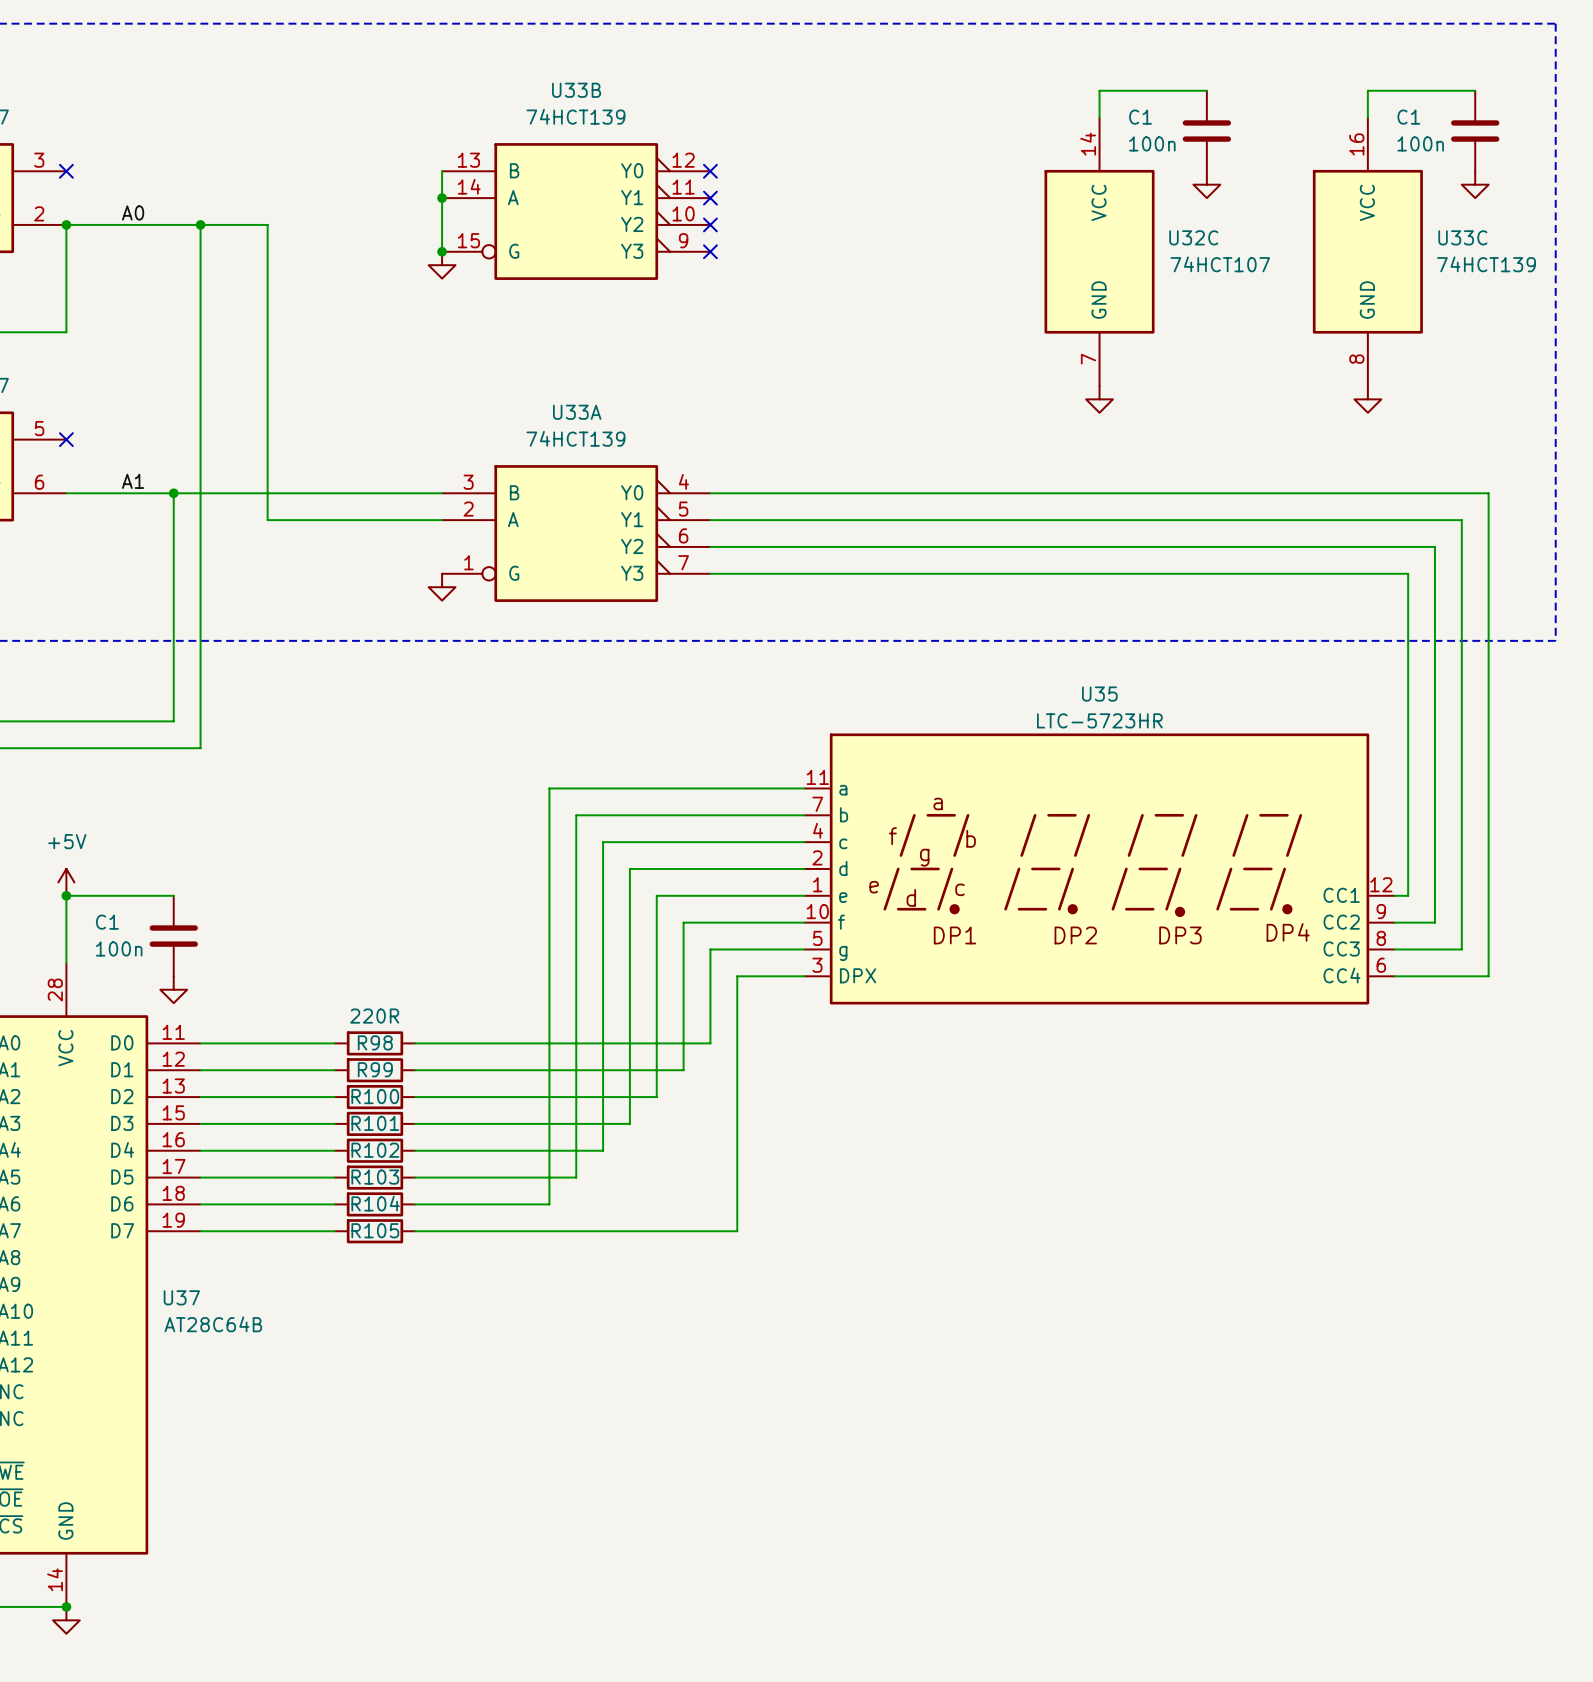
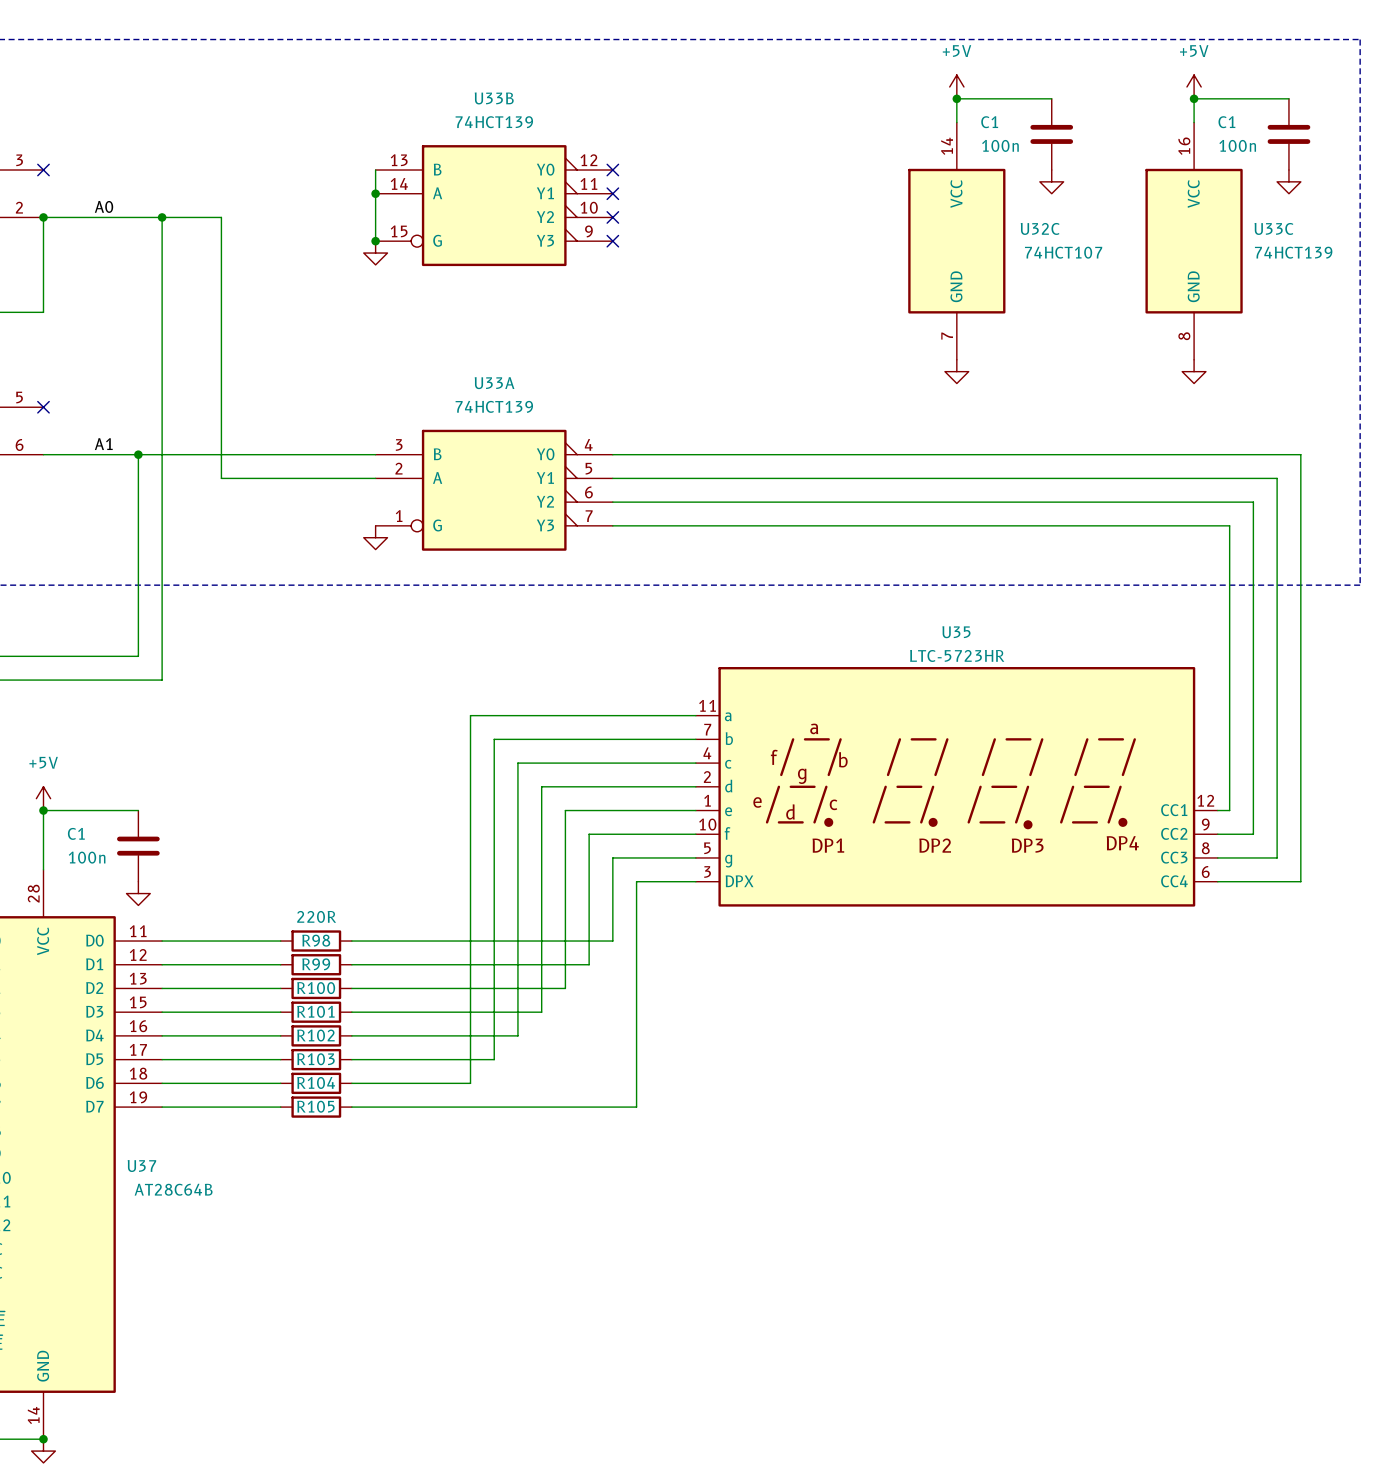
power symbol: none -> +5V (956, 86)
power symbol: none -> +5V (1194, 86)
junction: none -> (956, 98)
junction: none -> (1194, 98)

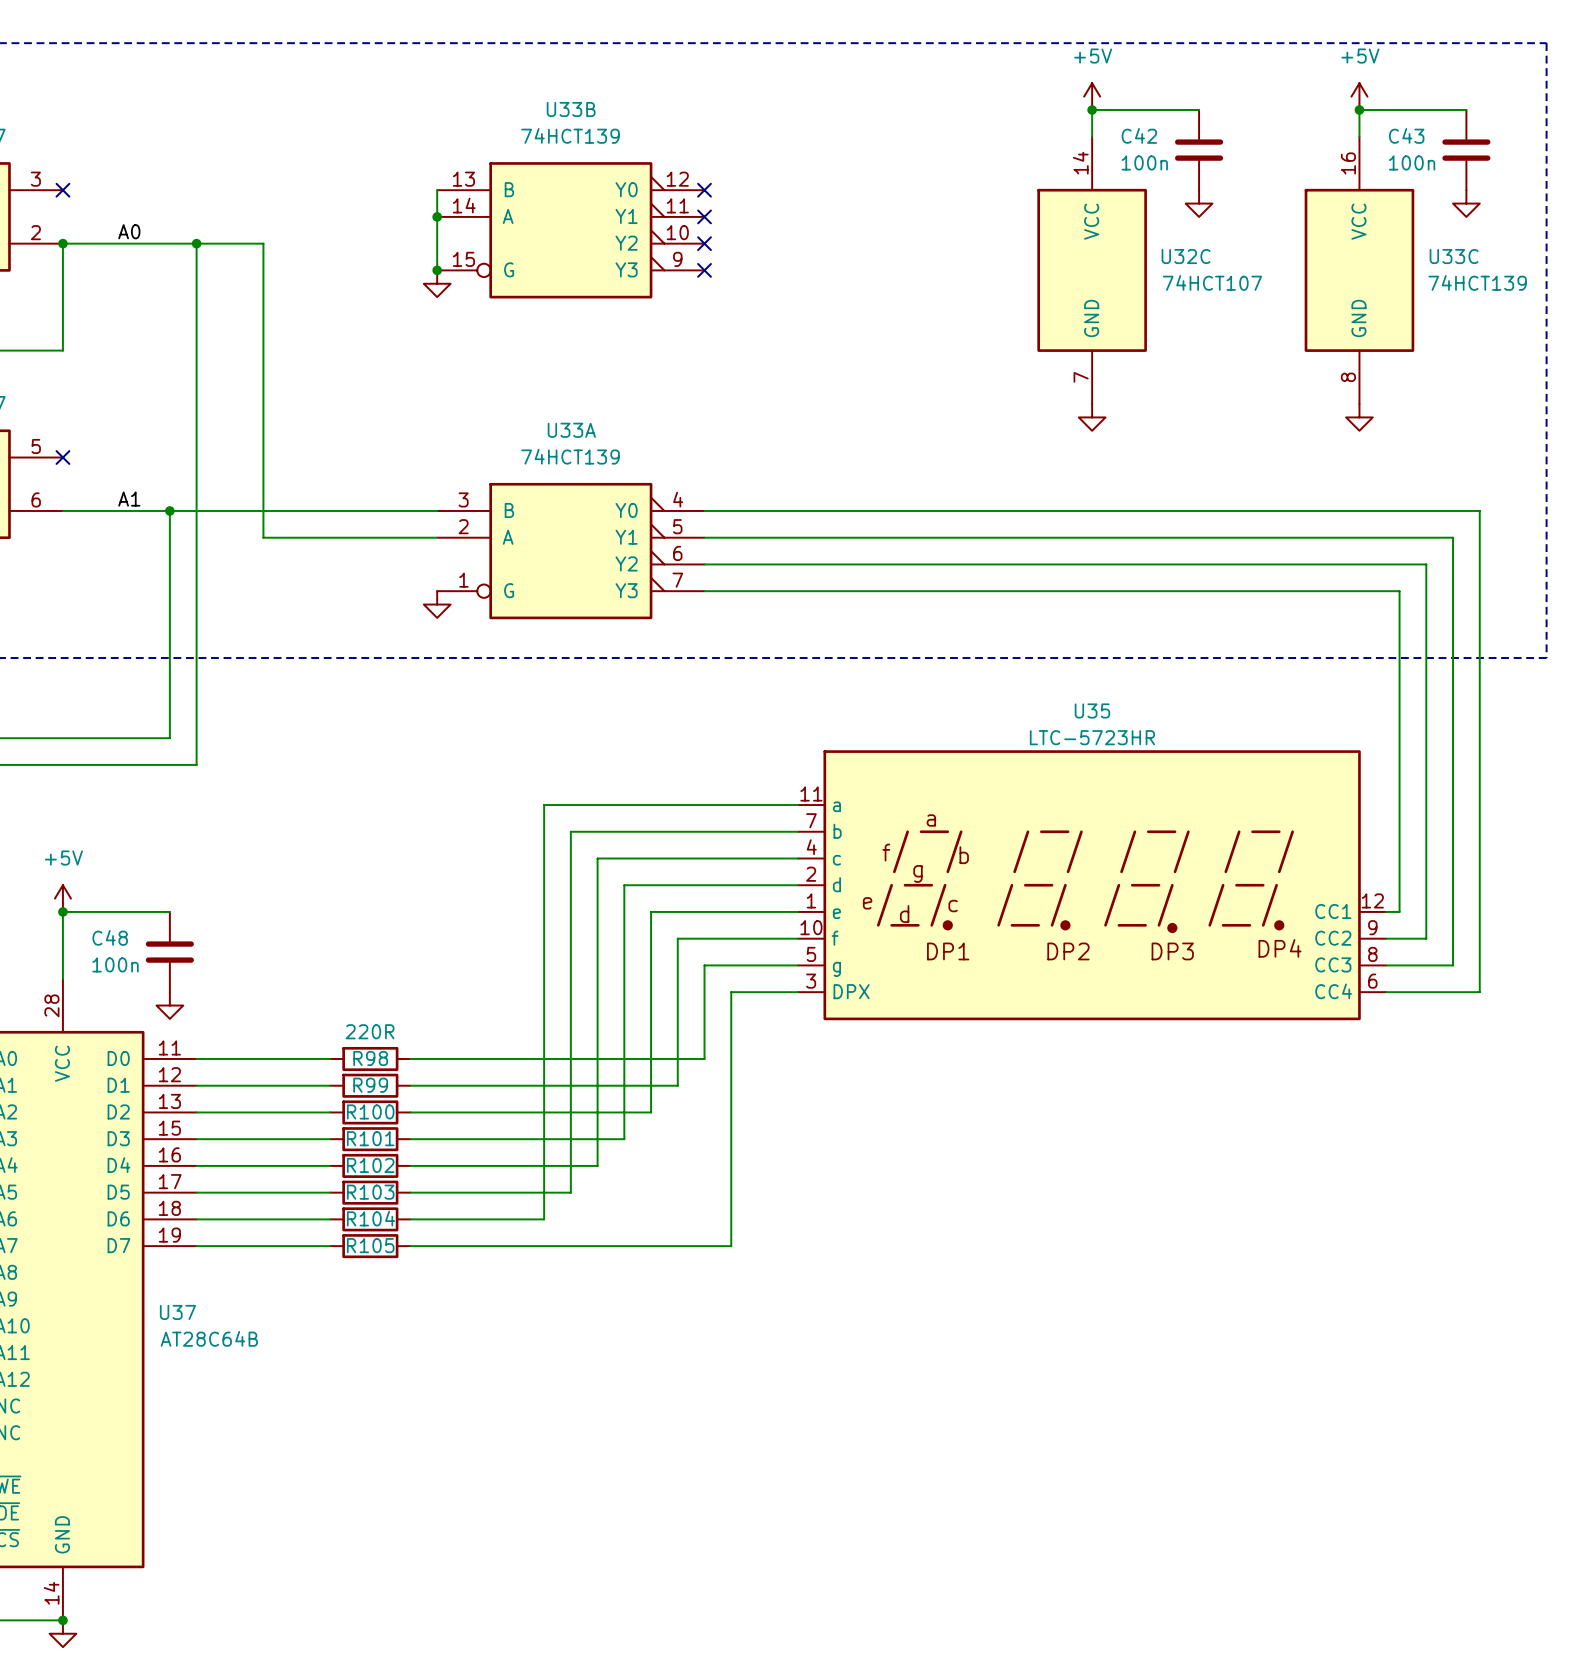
C1 name: C1 (989, 122) -> C42 (1139, 135)
C1 name: C1 (1226, 122) -> C43 (1406, 135)
C1 name: C1 (76, 833) -> C48 (110, 937)

